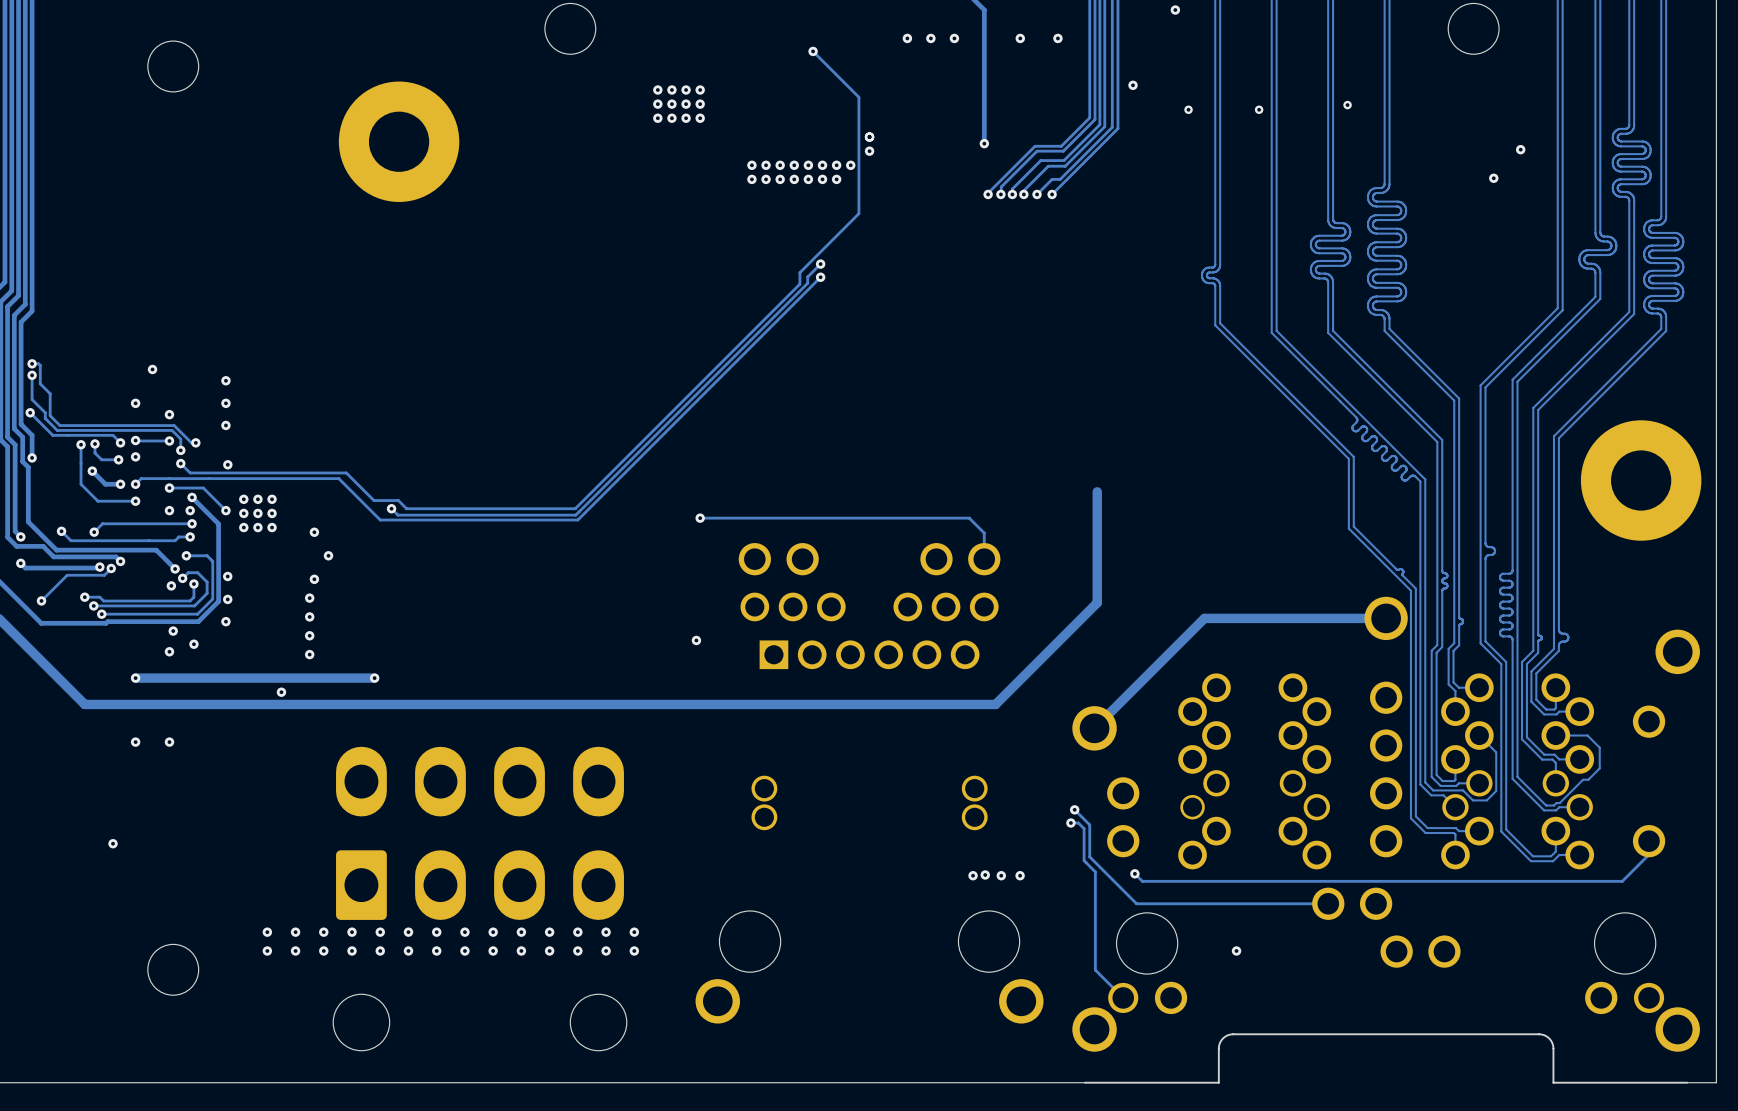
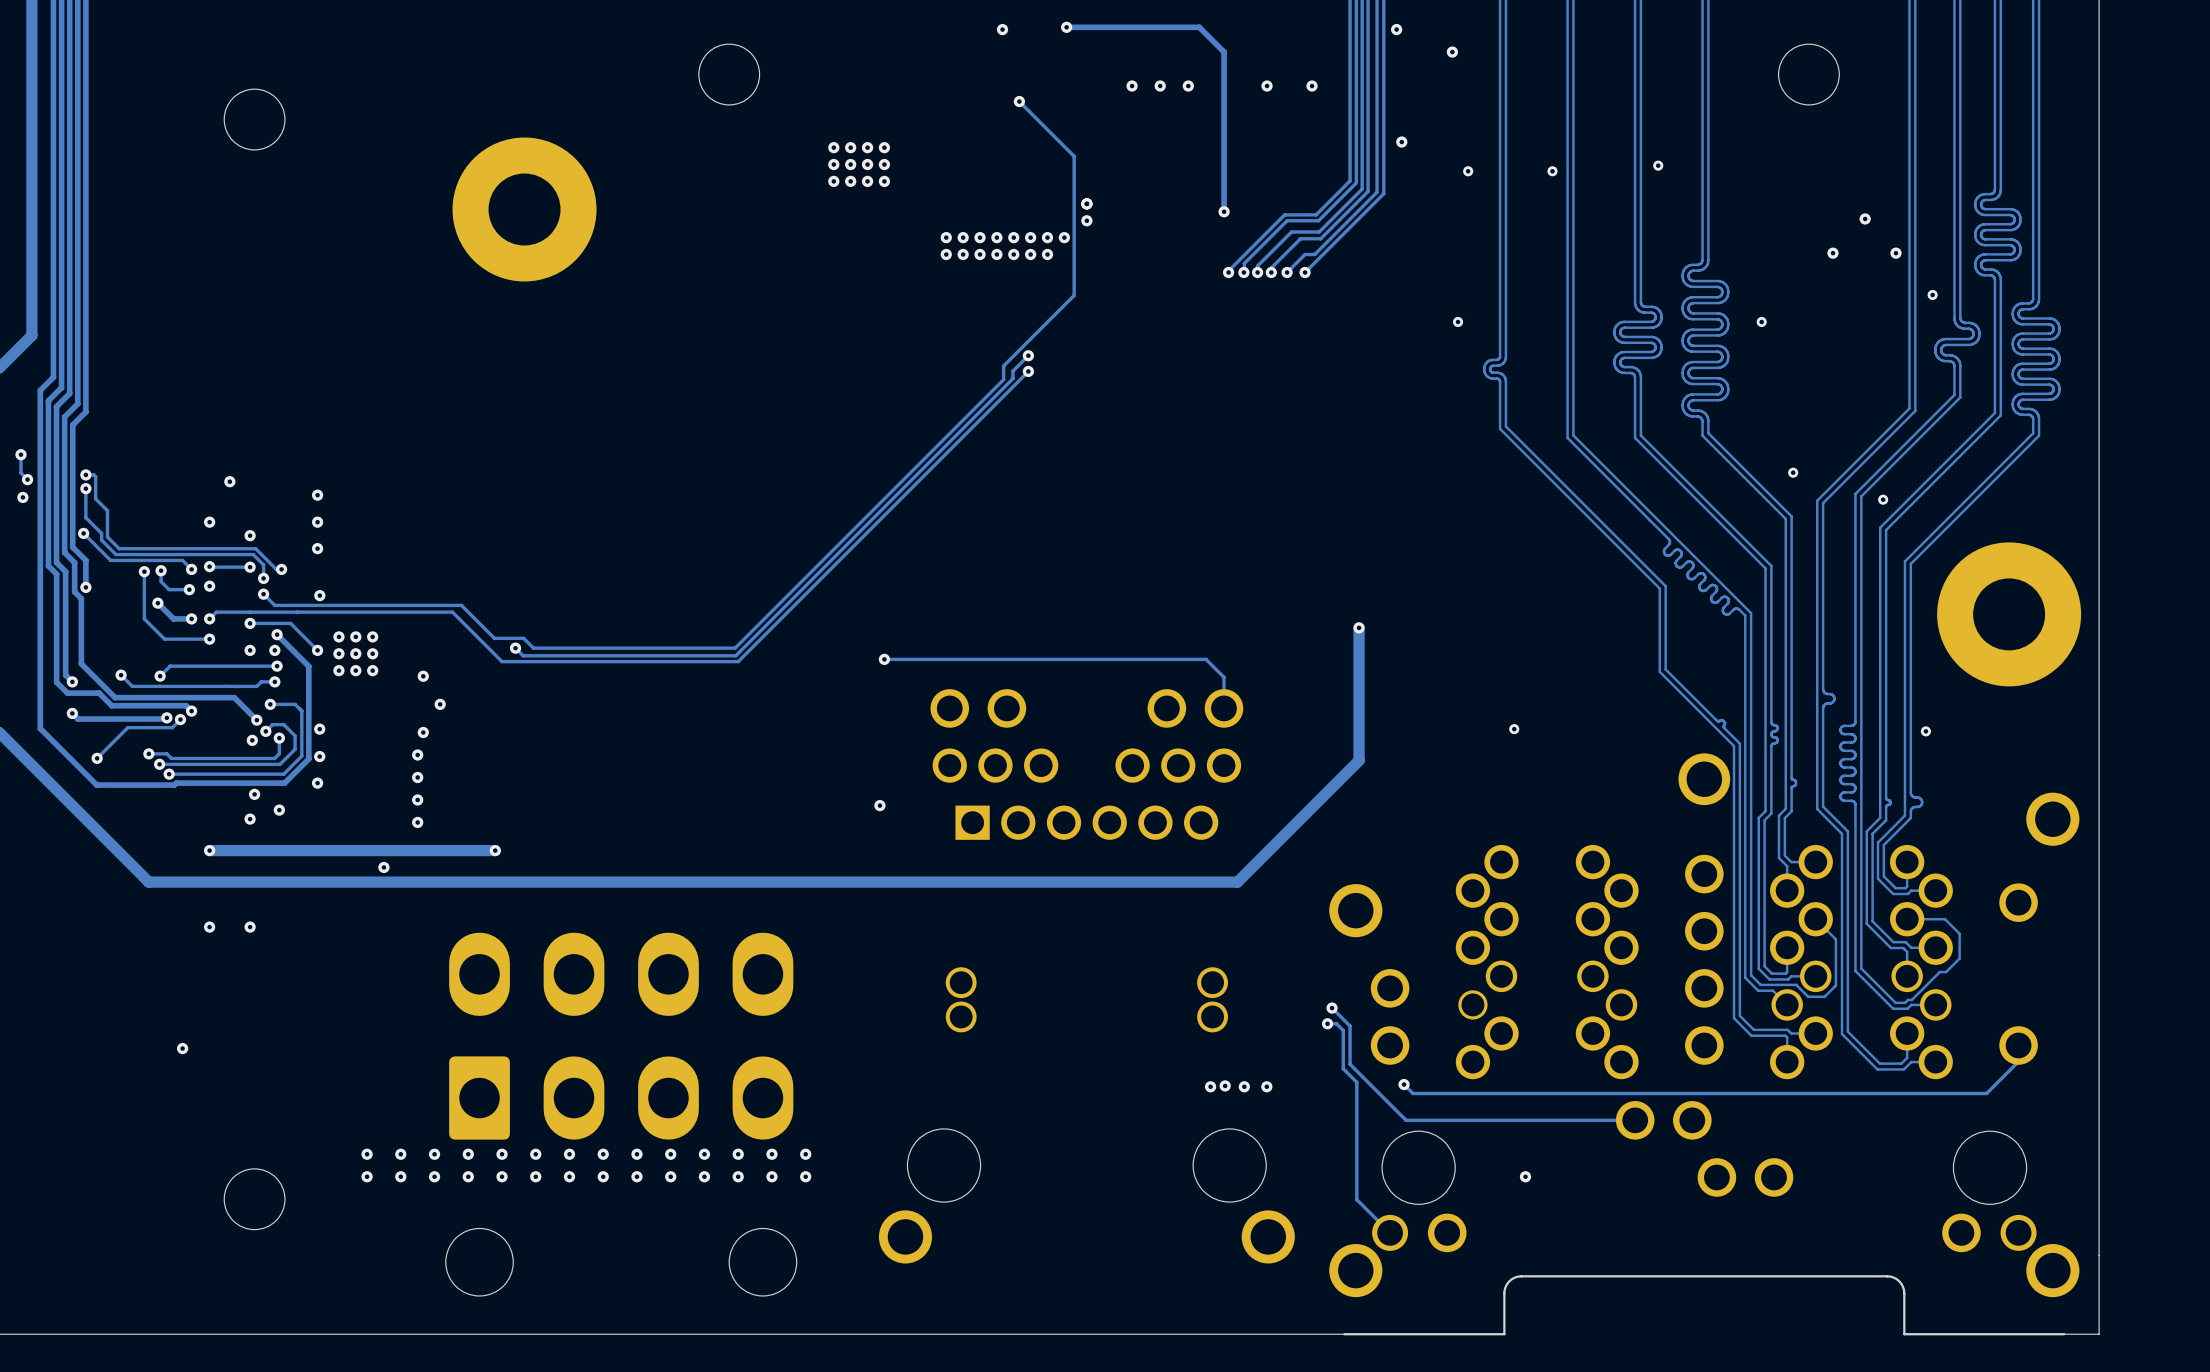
via: none -> (1895, 253)
via: none -> (1932, 294)
via: none -> (1458, 321)
via: none -> (1761, 321)
via: none -> (1793, 472)
via: none -> (1883, 499)
via: none -> (1359, 627)
via: none -> (1514, 729)
via: none -> (1925, 731)
track: (1386, 618) (1204, 618) (1094, 728) -> none

